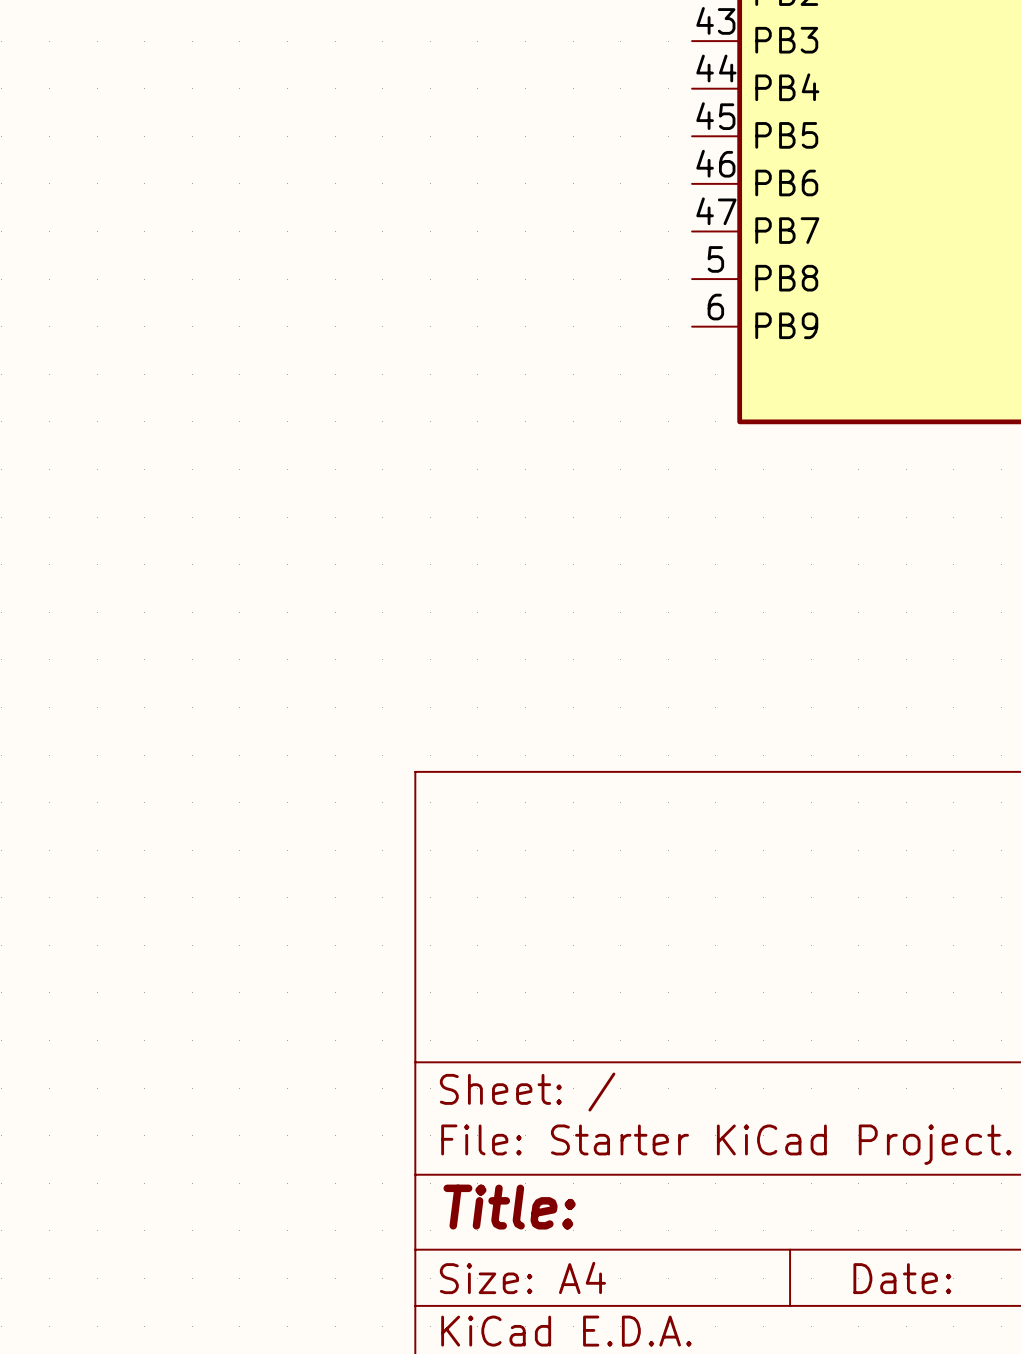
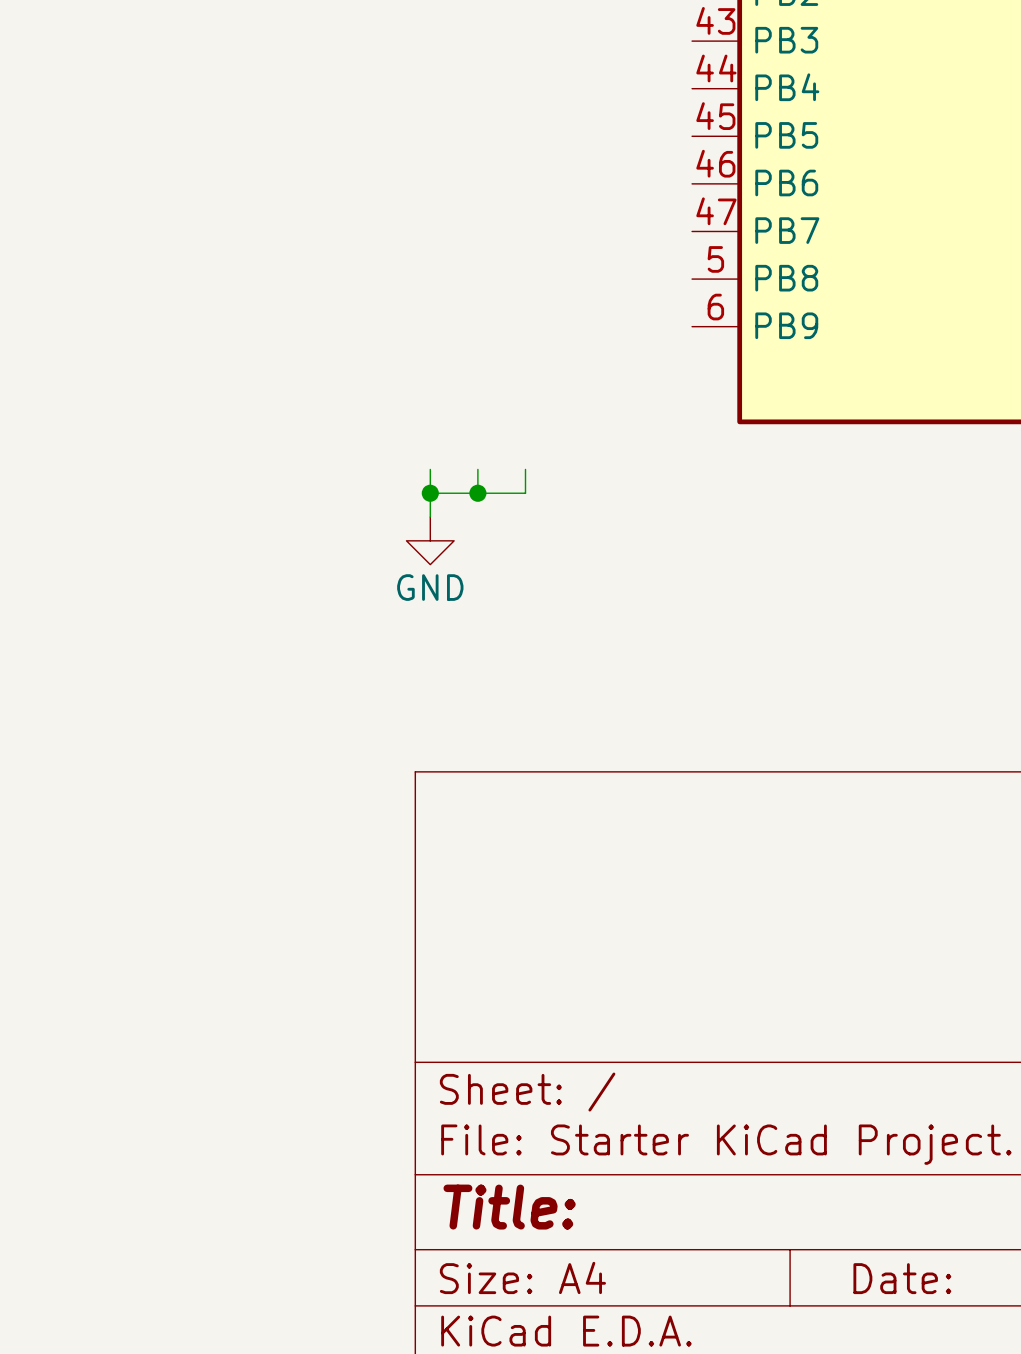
wire: none -> (430, 469) (430, 517)
wire: none -> (477, 469) (477, 493)
wire: none -> (525, 469) (525, 493) (430, 493)
junction: none -> (430, 493)
junction: none -> (477, 493)
power symbol: none -> GND (430, 540)

